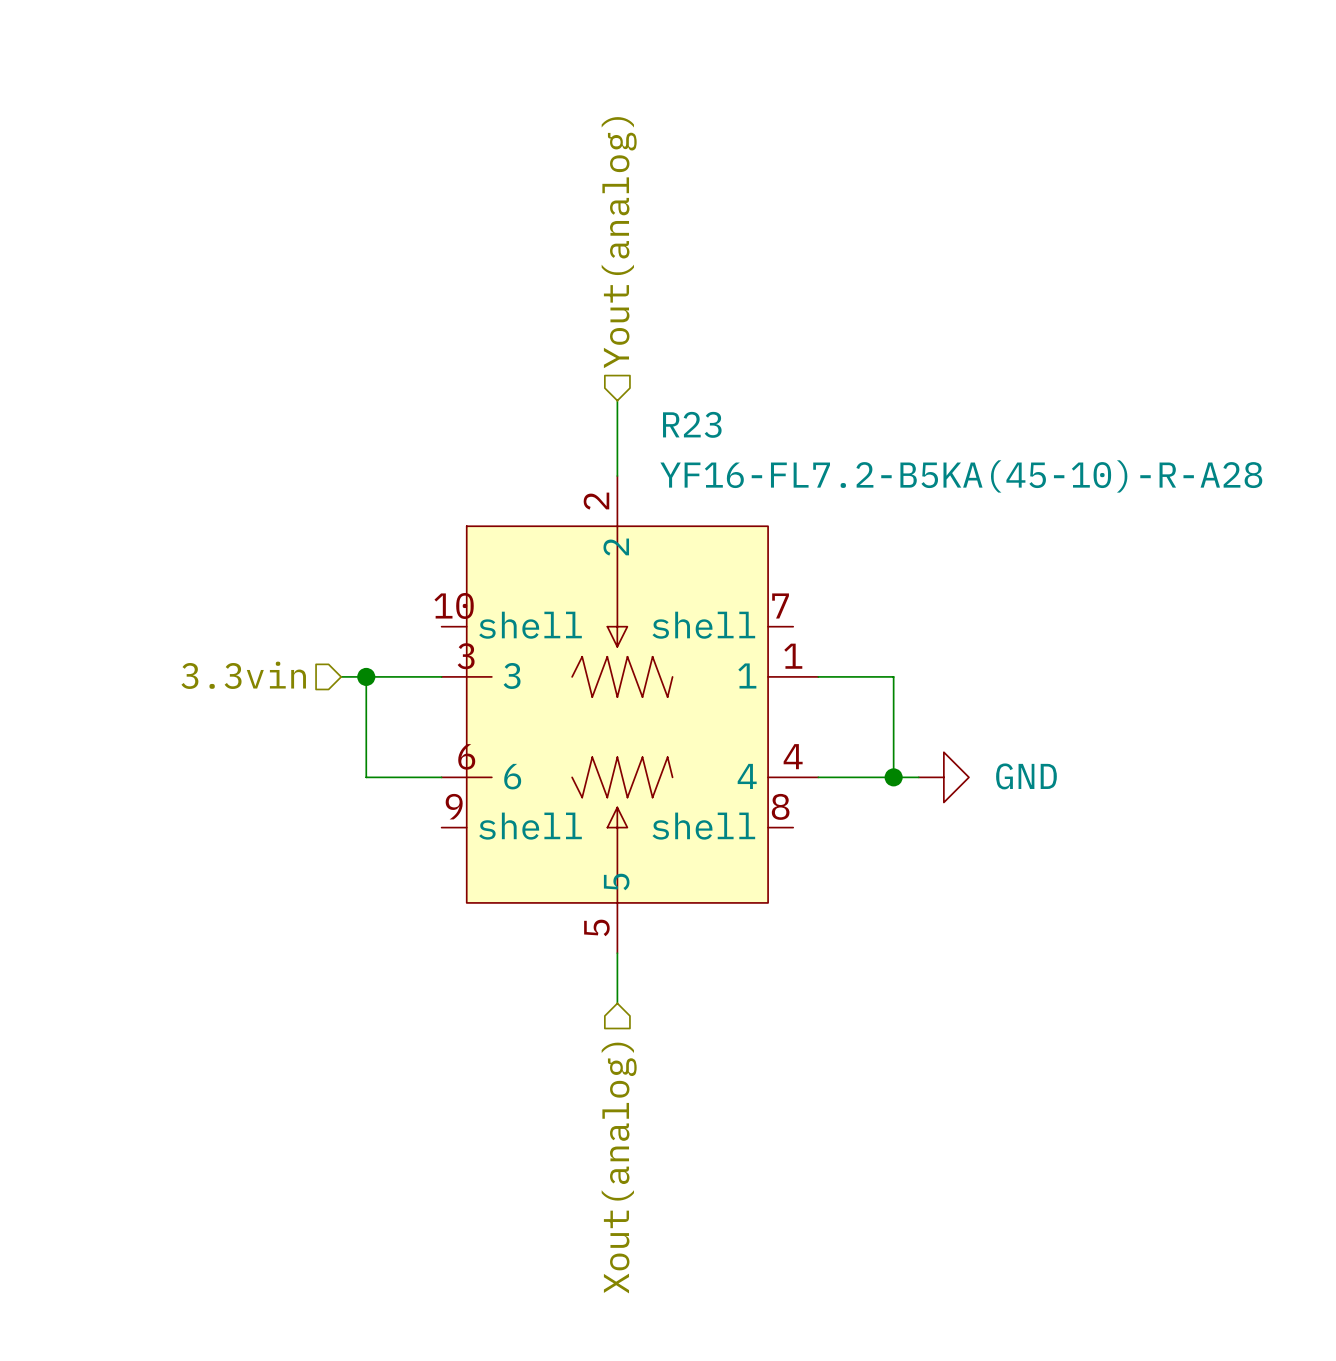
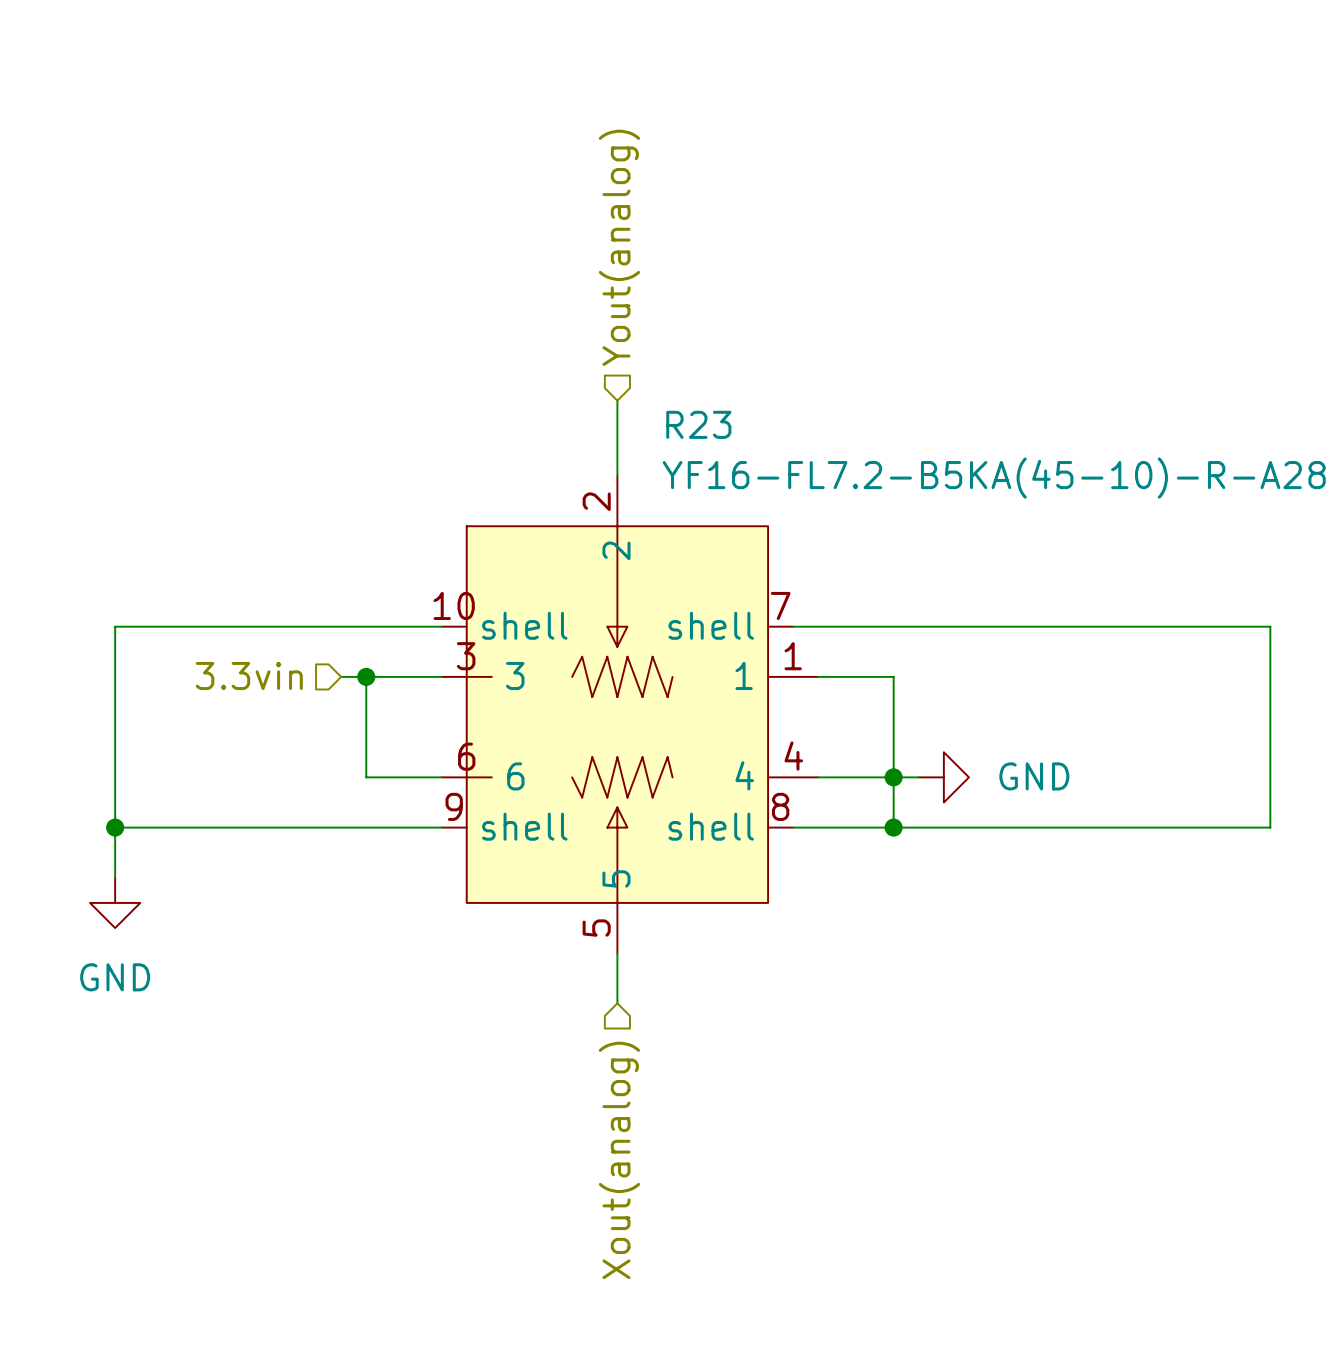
wire: none -> (441, 626) (115, 626) (115, 877)
wire: none -> (793, 626) (1270, 626) (1270, 827) (793, 827)
wire: none -> (893, 777) (893, 827)
wire: none -> (115, 827) (441, 827)
junction: none -> (115, 827)
junction: none -> (893, 827)
power symbol: none -> GND (115, 902)

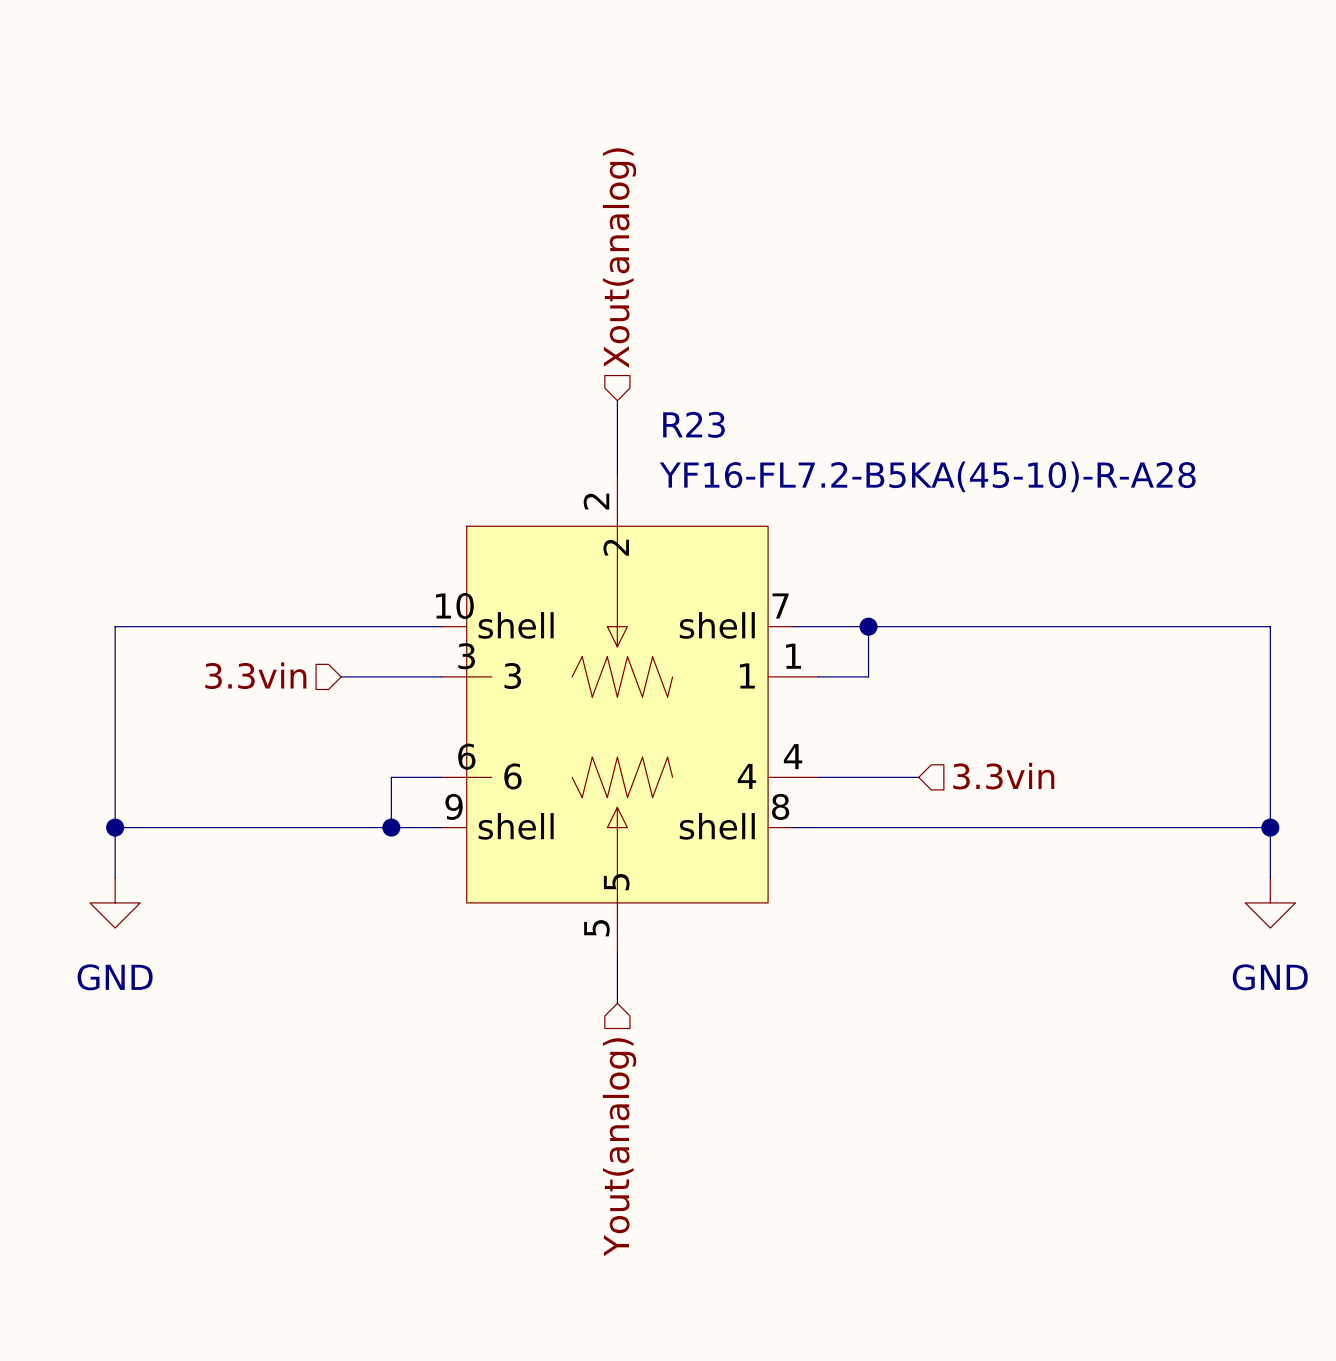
hierarchical label: Yout(analog) (619, 247) -> Xout(analog) (619, 258)
junction: none -> (868, 626)
wire: (366, 676) (366, 777) (391, 777) -> (391, 827) (391, 777)
junction: (366, 676) -> none
wire: (868, 676) (893, 676) (893, 827) -> (868, 676) (868, 626)
hierarchical label: none -> 3.3vin (1003, 776)
junction: (893, 777) -> none
power symbol rotation: 0° (943, 777) -> 90° clockwise (1270, 902)
power symbol position: GND (943, 777) -> GND (1270, 902)
junction: none -> (391, 827)
junction: (893, 827) -> none
wire: none -> (1270, 827) (1270, 877)
junction: none -> (1270, 827)
hierarchical label: Xout(analog) (619, 1160) -> Yout(analog) (619, 1147)

